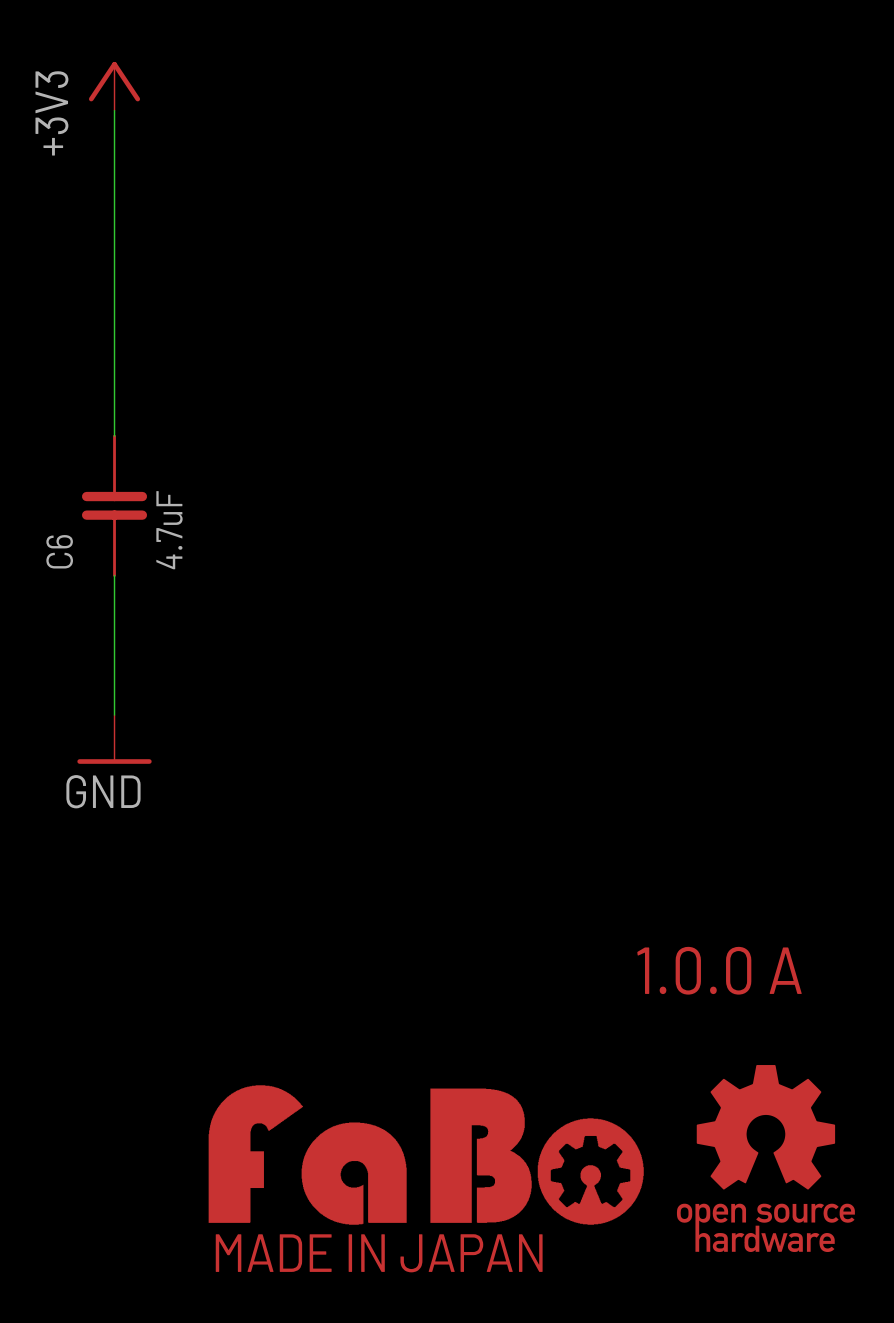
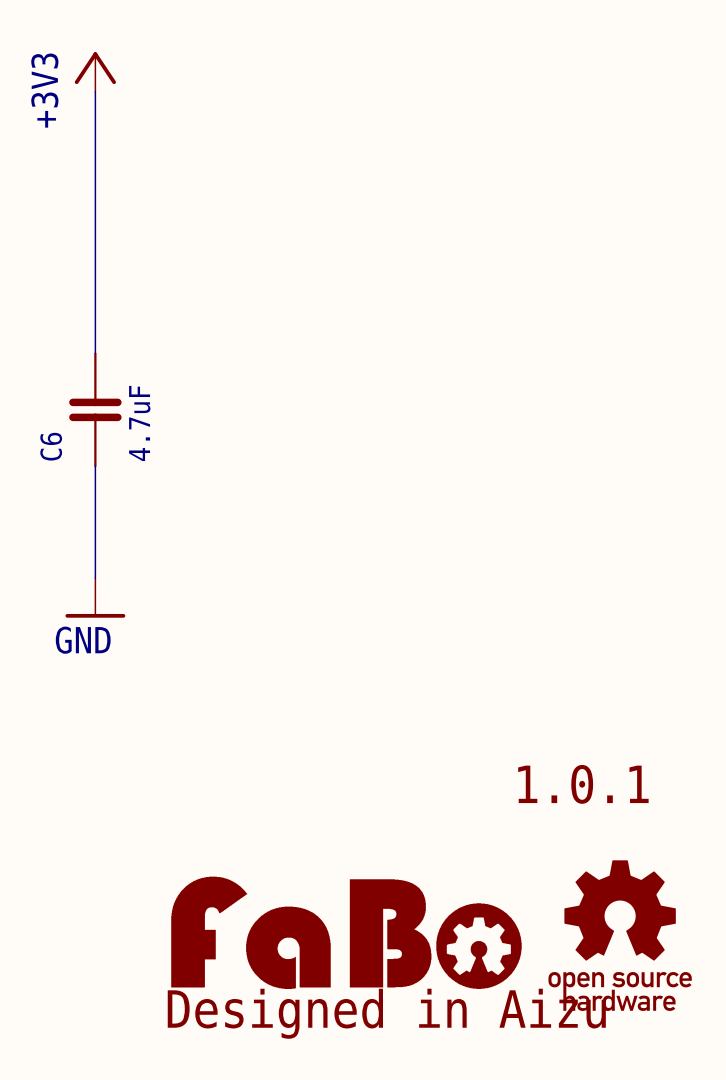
text: 1.0.0 A (719, 970) -> 1.0.1 (583, 784)
part text: MADE IN JAPAN (379, 1253) -> none
part text: none -> Designed in Aizu (386, 1013)

